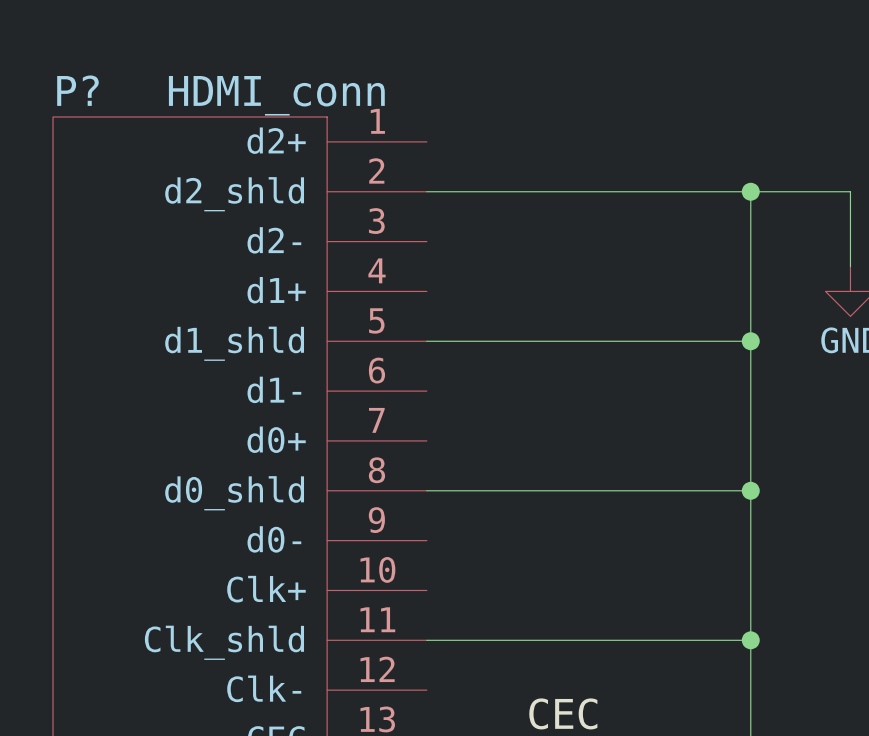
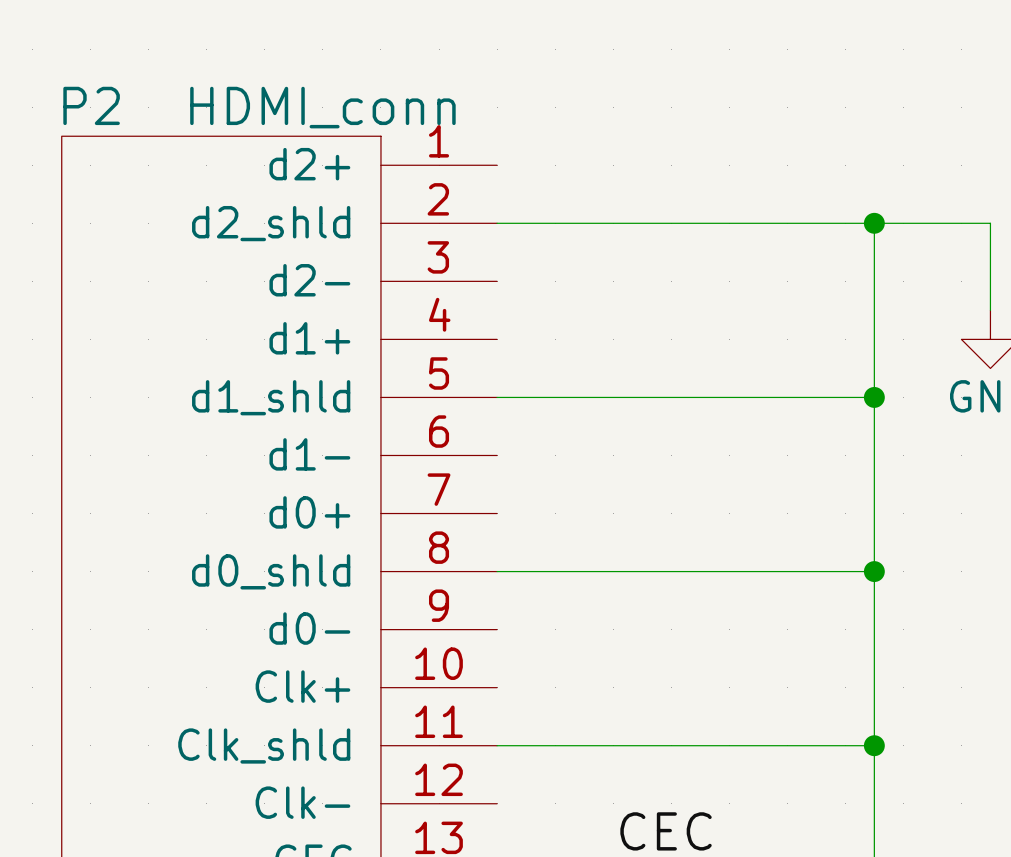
P? name: P? (77, 90) -> P2 (91, 105)

